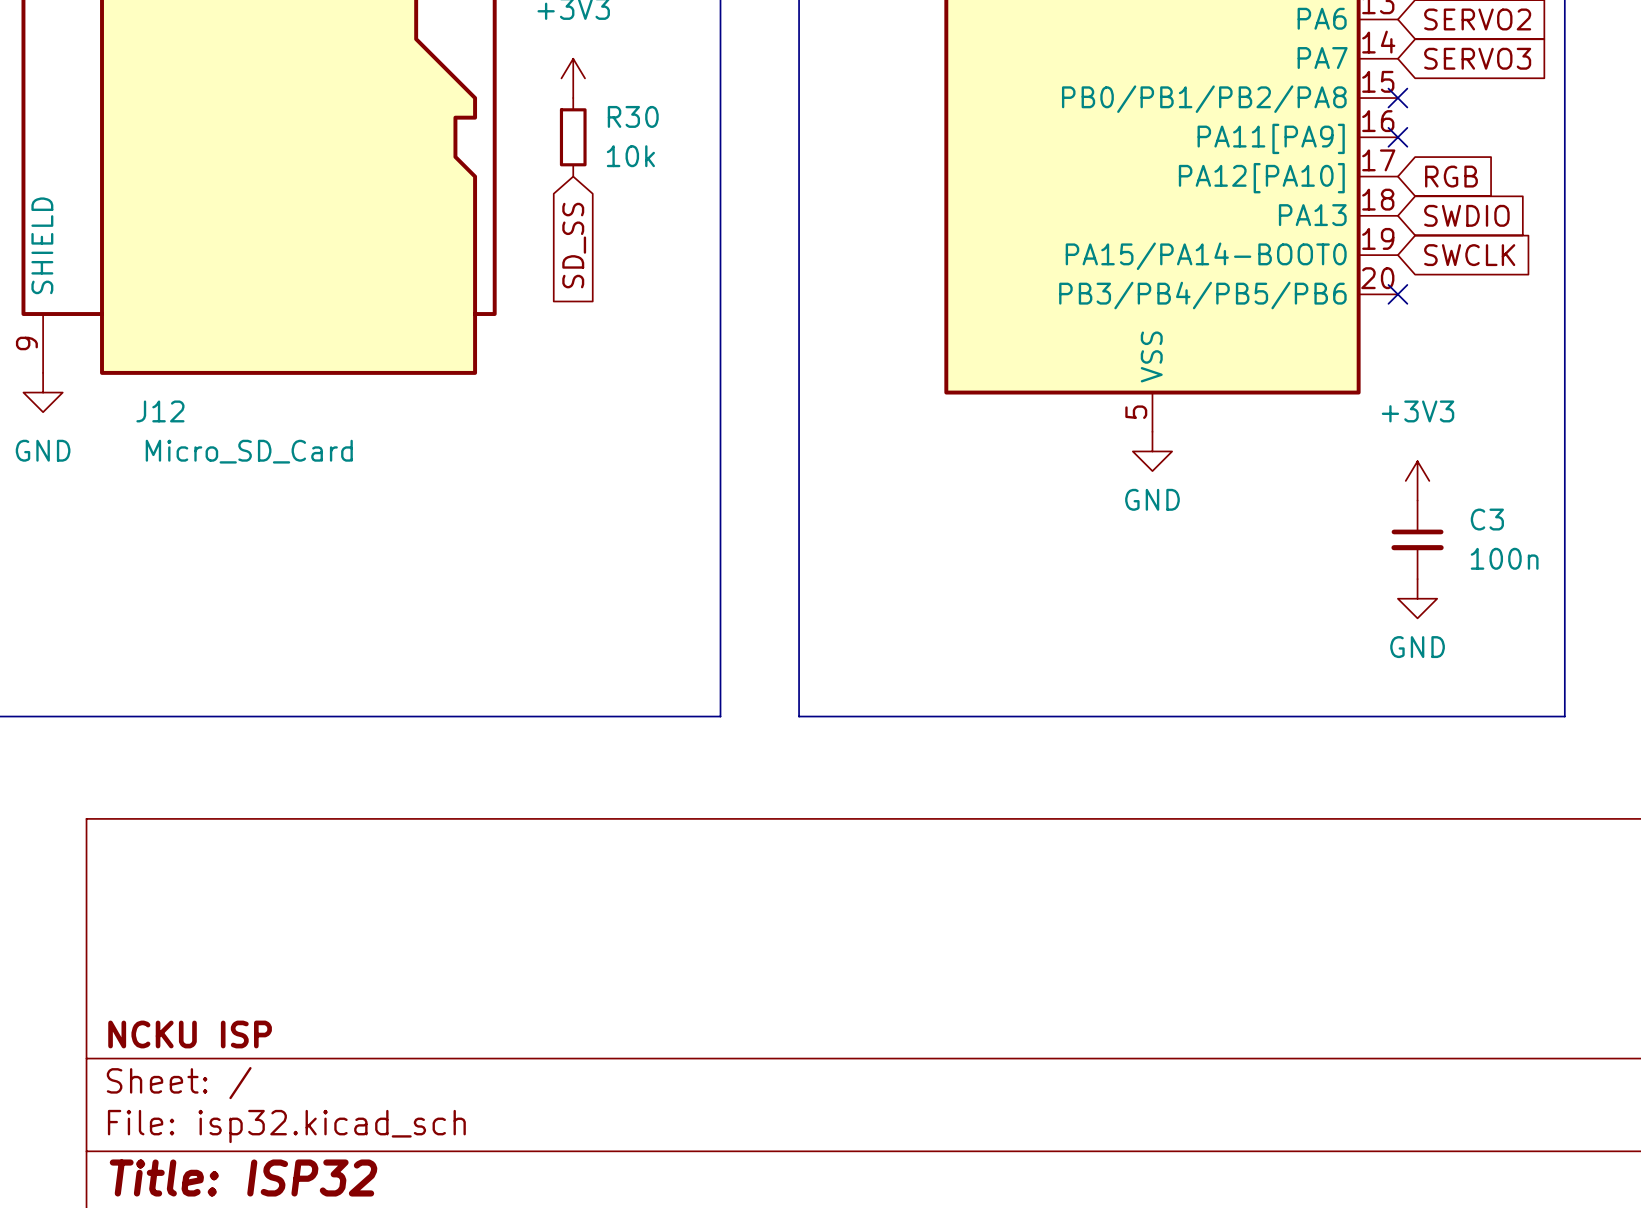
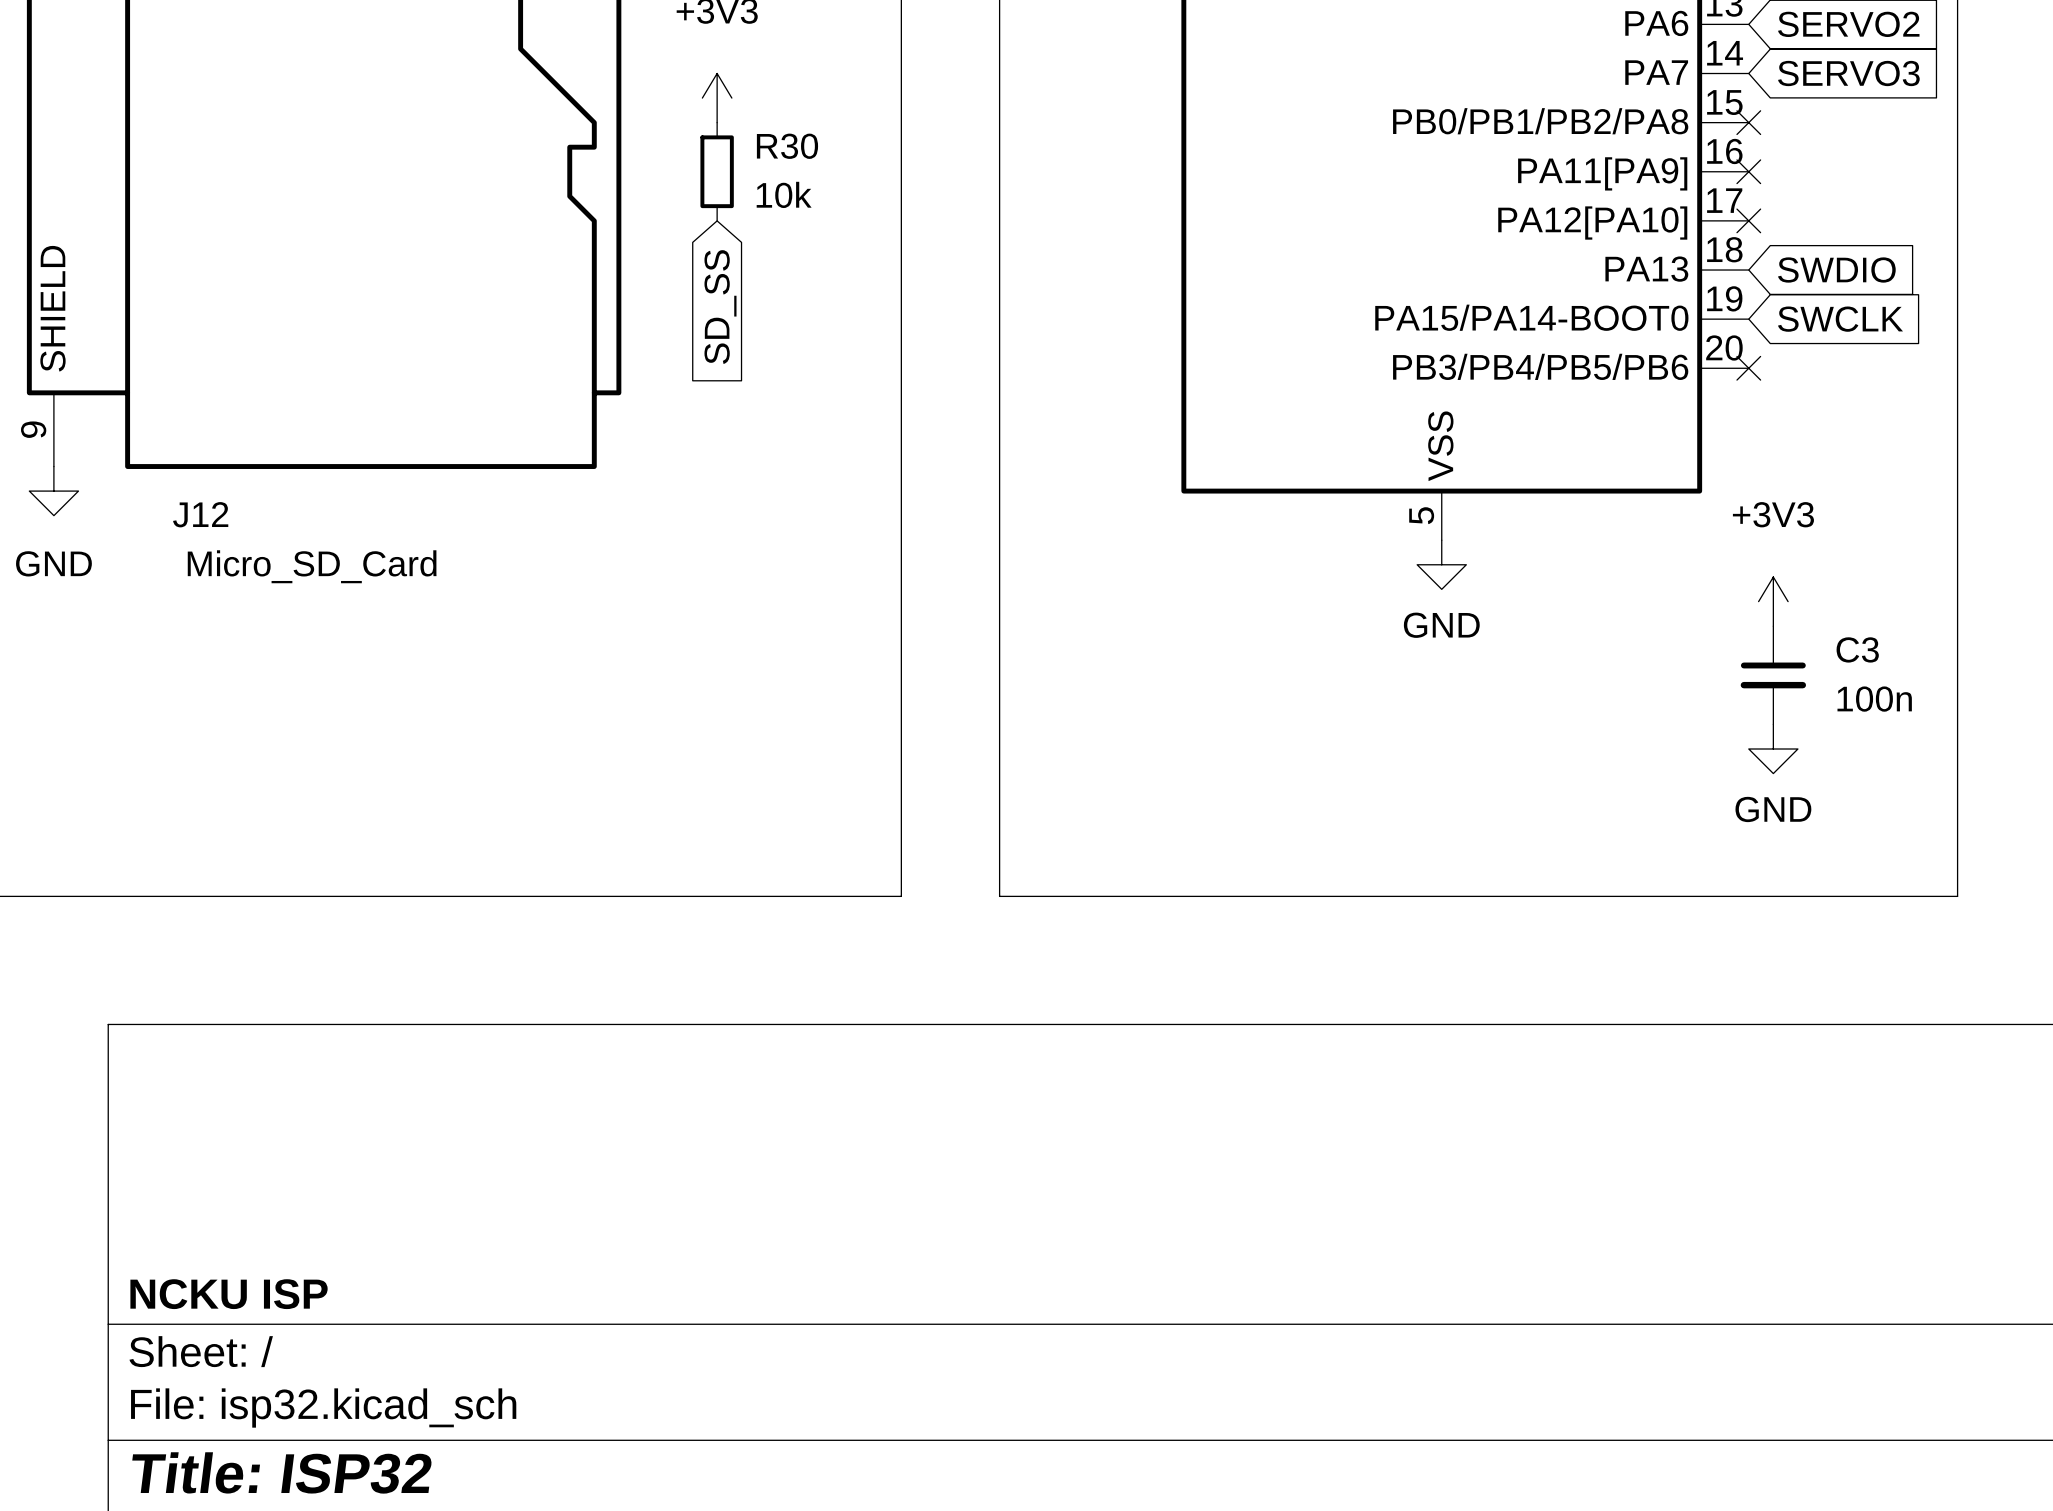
no-connect mark: none -> (1748, 220)
global label: RGB (1451, 176) -> none

